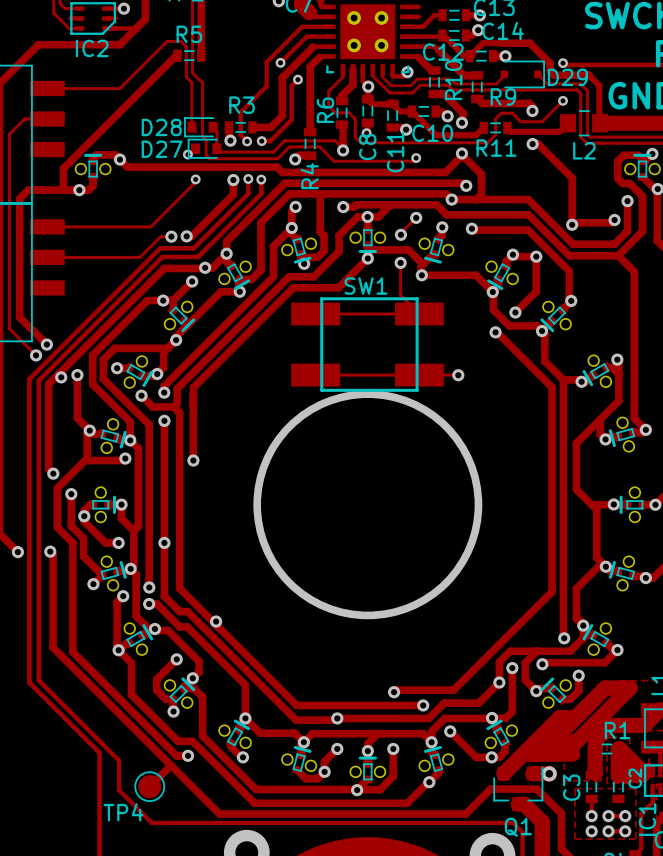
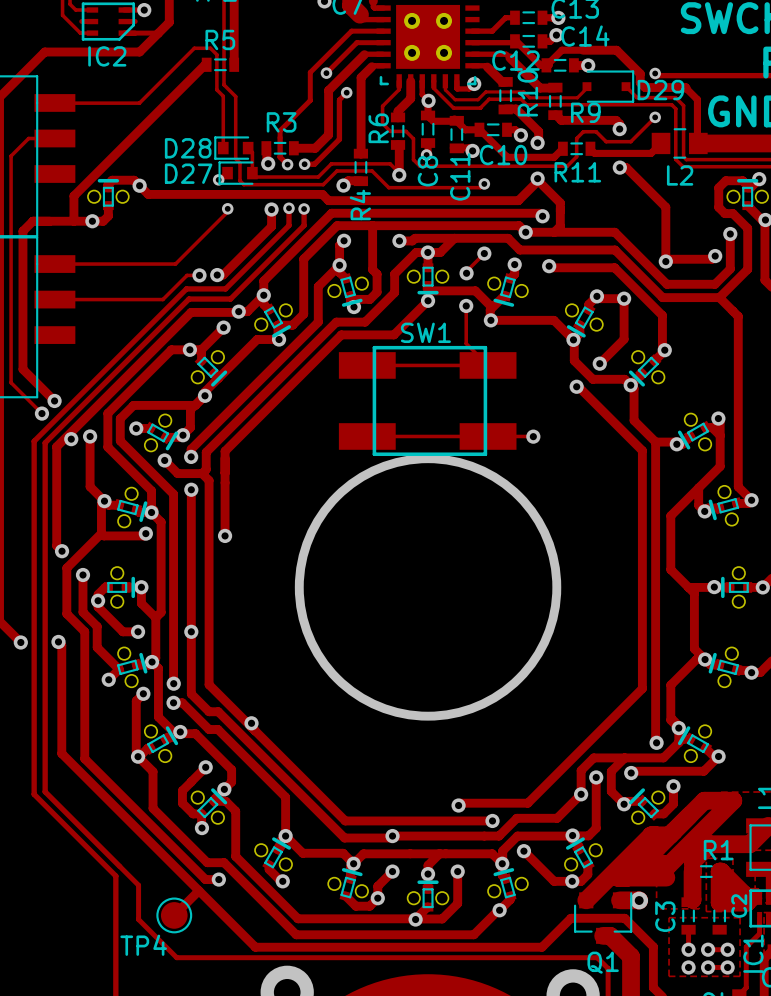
track: (405, 6) (418, 6) -> none
track: (405, 16) (418, 16) -> none

